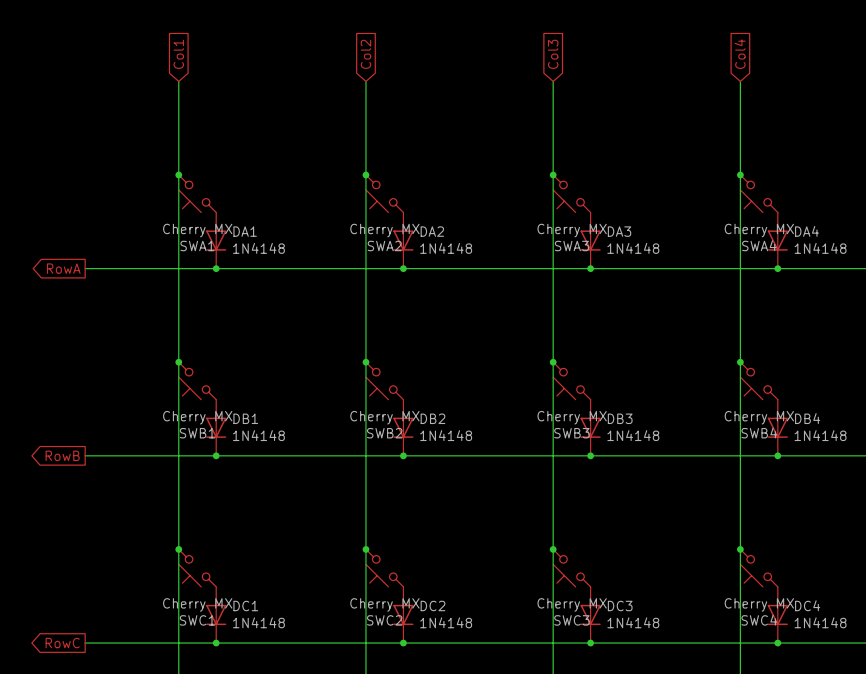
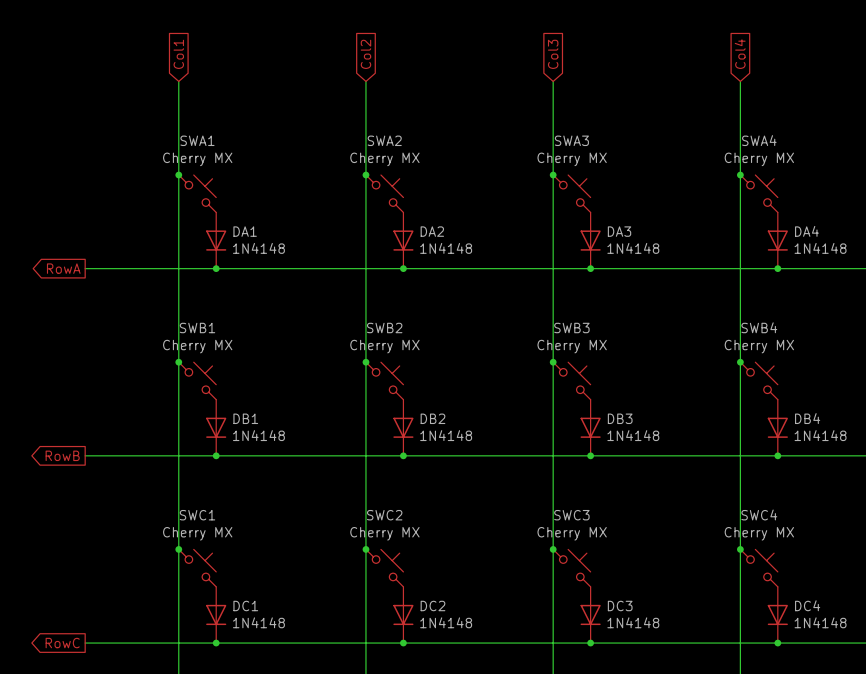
SWA1 rotation: 0° (197, 193) -> 180° (197, 193)
SWA2 rotation: 0° (384, 193) -> 180° (384, 193)
SWA3 rotation: 0° (571, 193) -> 180° (571, 193)
SWA4 rotation: 0° (759, 193) -> 180° (759, 193)
SWB1 rotation: 0° (197, 380) -> 180° (197, 380)
SWB2 rotation: 0° (384, 380) -> 180° (384, 380)
SWB3 rotation: 0° (571, 380) -> 180° (571, 380)
SWB4 rotation: 0° (759, 380) -> 180° (759, 380)
SWC1 rotation: 0° (197, 568) -> 180° (197, 568)
SWC2 rotation: 0° (384, 568) -> 180° (384, 568)
SWC3 rotation: 0° (571, 568) -> 180° (571, 568)
SWC4 rotation: 0° (759, 568) -> 180° (759, 568)

